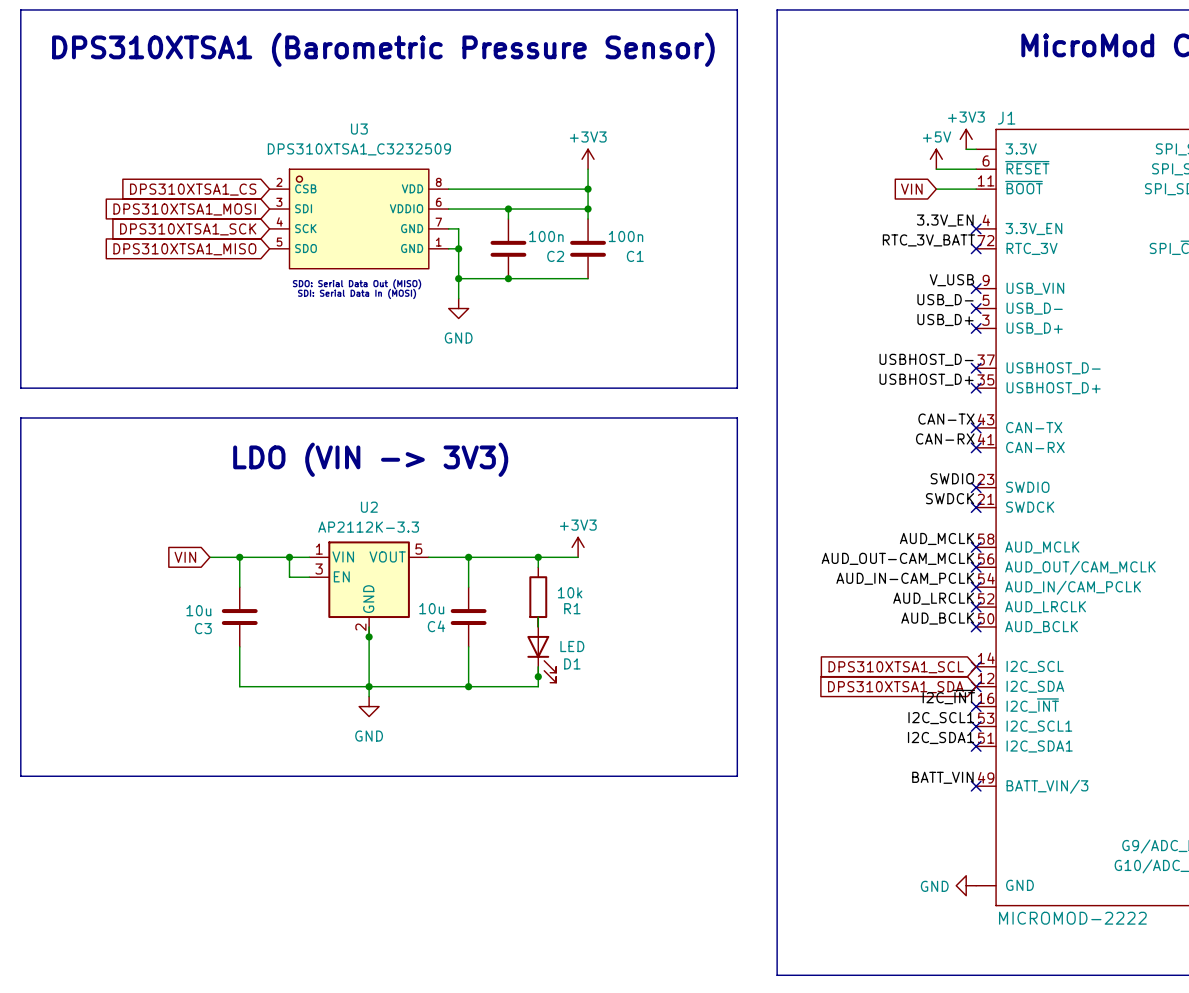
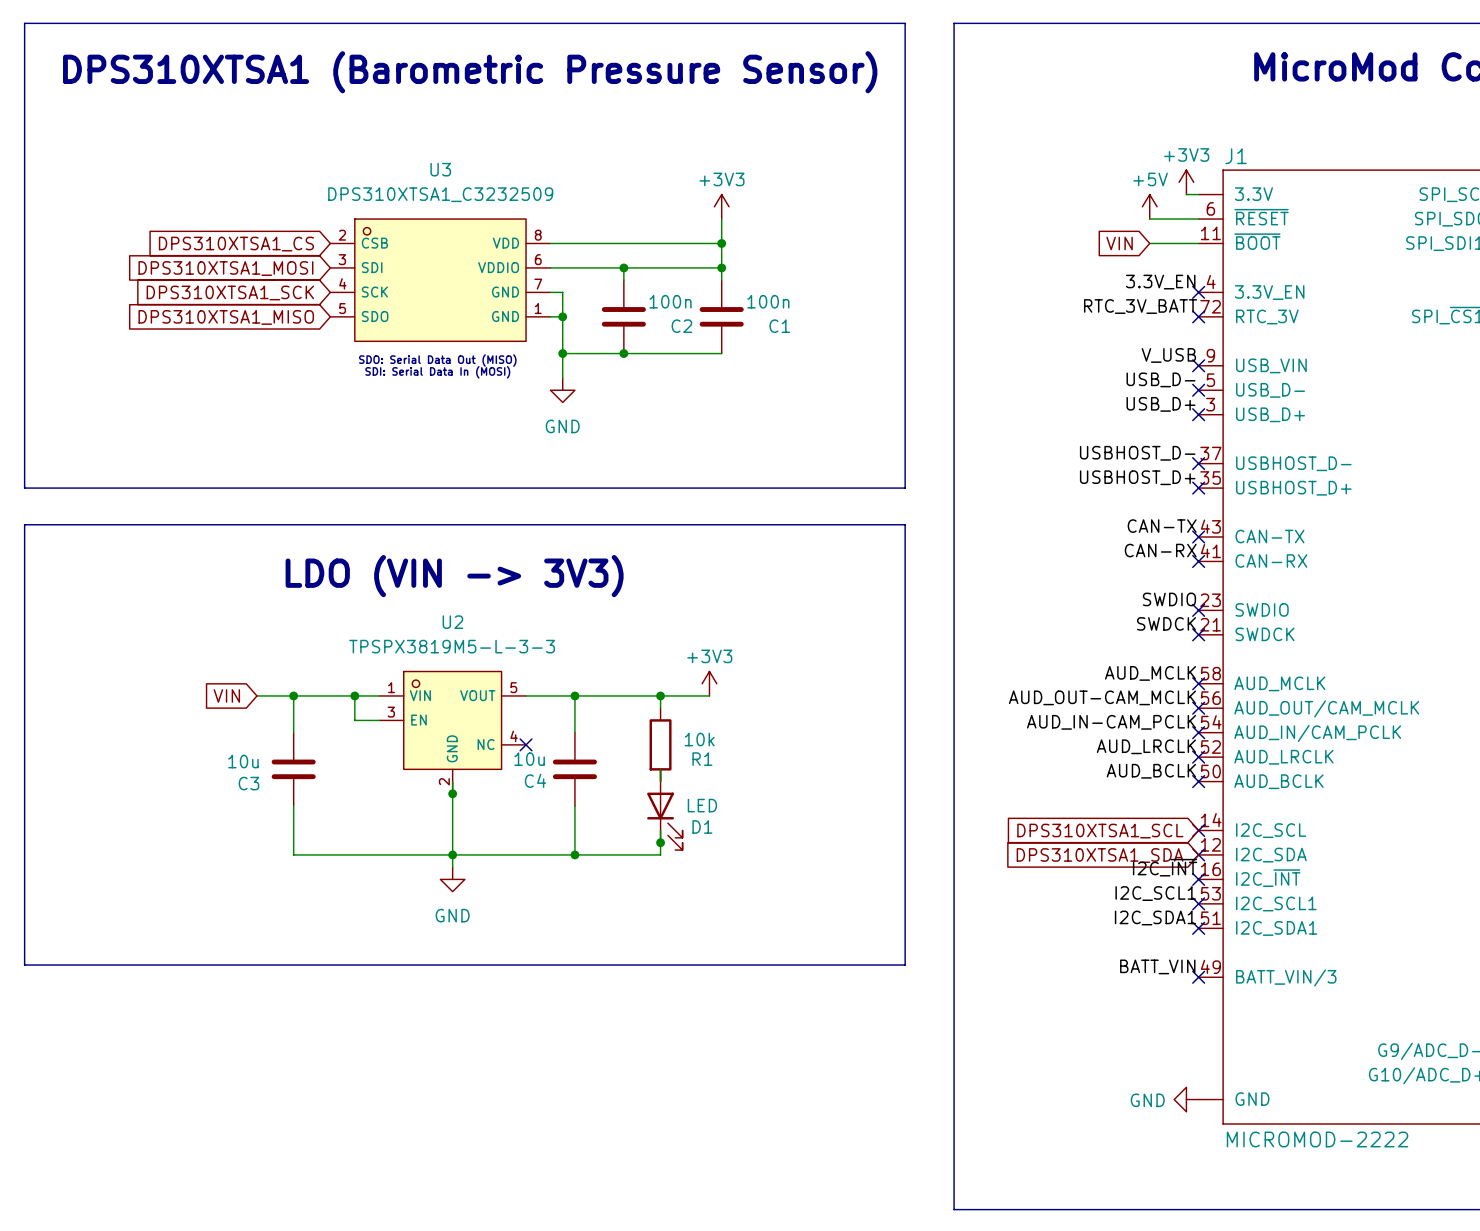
U2 value: AP2112K-3.3 (368, 527) -> TPSPX3819M5-L-3-3 (452, 646)
U2 symbol: [309, 541, 429, 637] -> [379, 671, 527, 794]
no-connect mark: none -> (526, 744)

